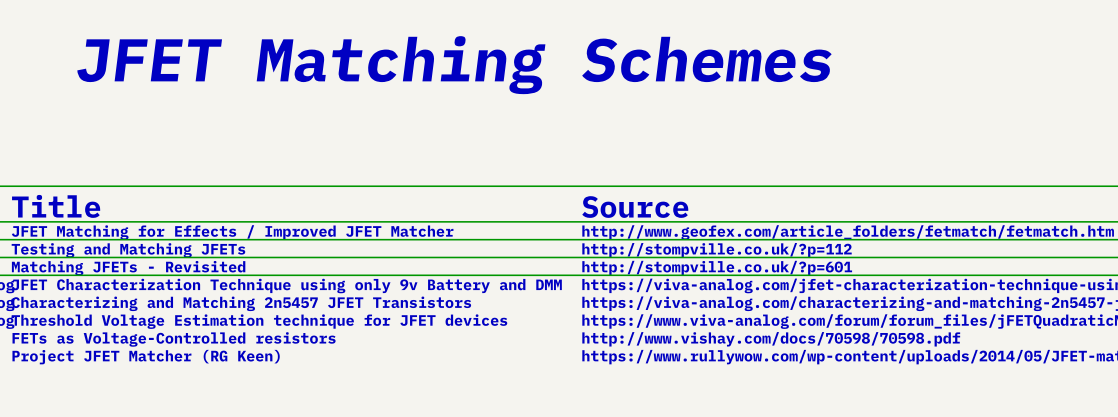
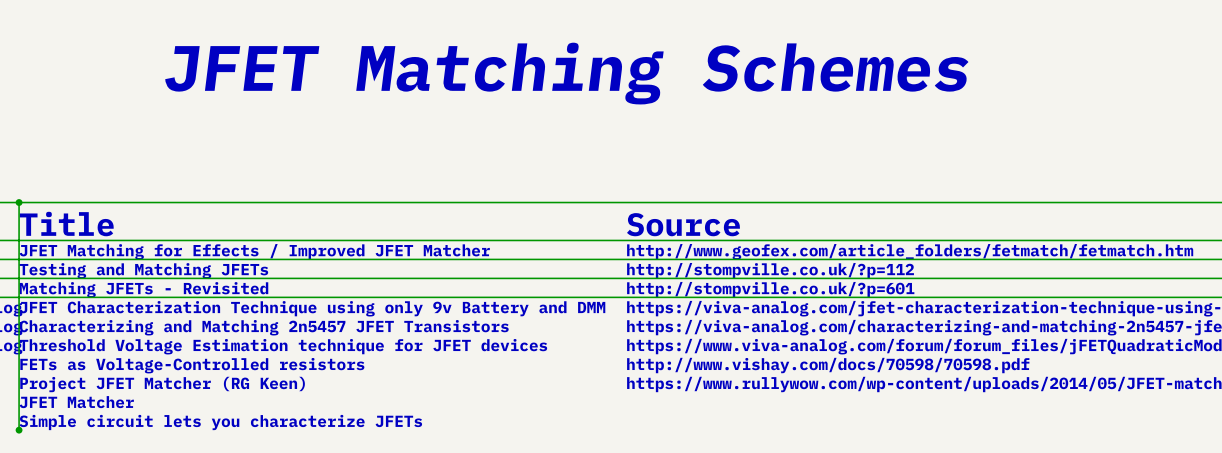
text position: JFET Matching Schemes (454, 65) -> JFET Matching Schemes (566, 73)
wire: none -> (19, 202) (19, 430)
junction: none -> (19, 202)
text: none -> JFET Matcher (76, 402)
text: none -> Simple circuit lets you characterize JFETs (220, 422)
junction: none -> (19, 430)

